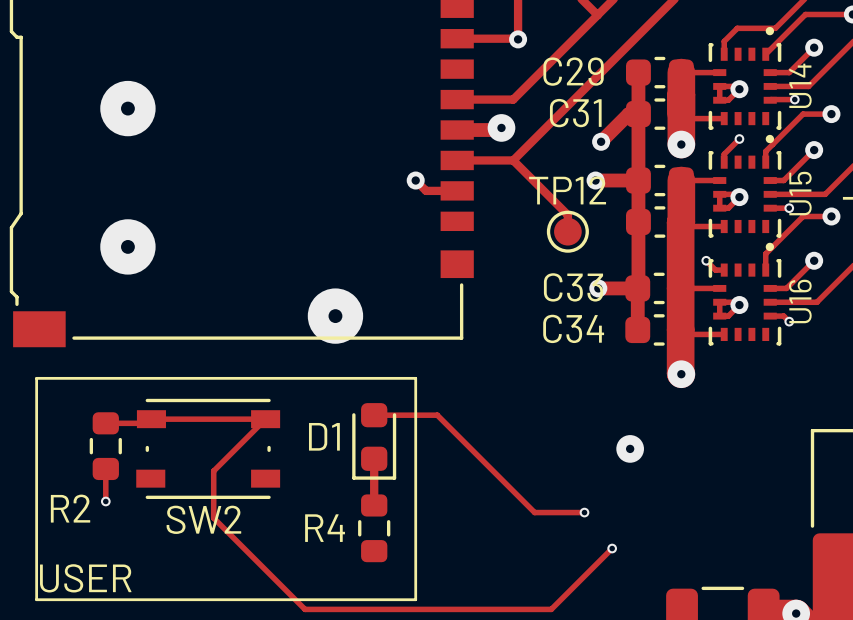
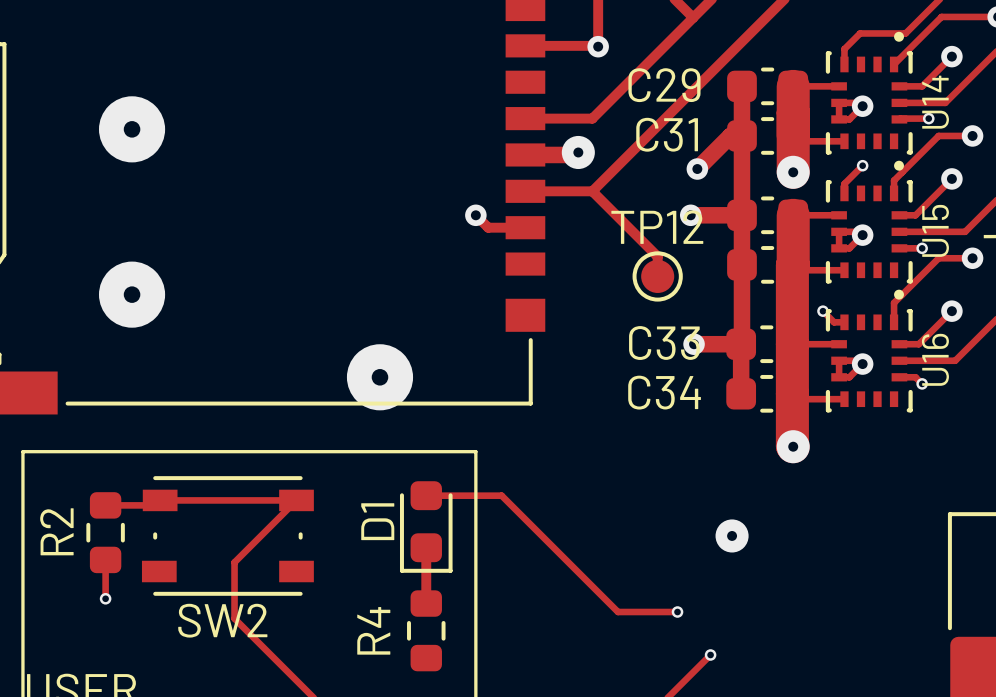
D1 name rotation: 0° (324, 436) -> 90° counterclockwise (377, 521)
R2 name rotation: 0° (70, 508) -> 90° counterclockwise (56, 531)
R4 name rotation: 0° (325, 528) -> 90° counterclockwise (373, 630)

